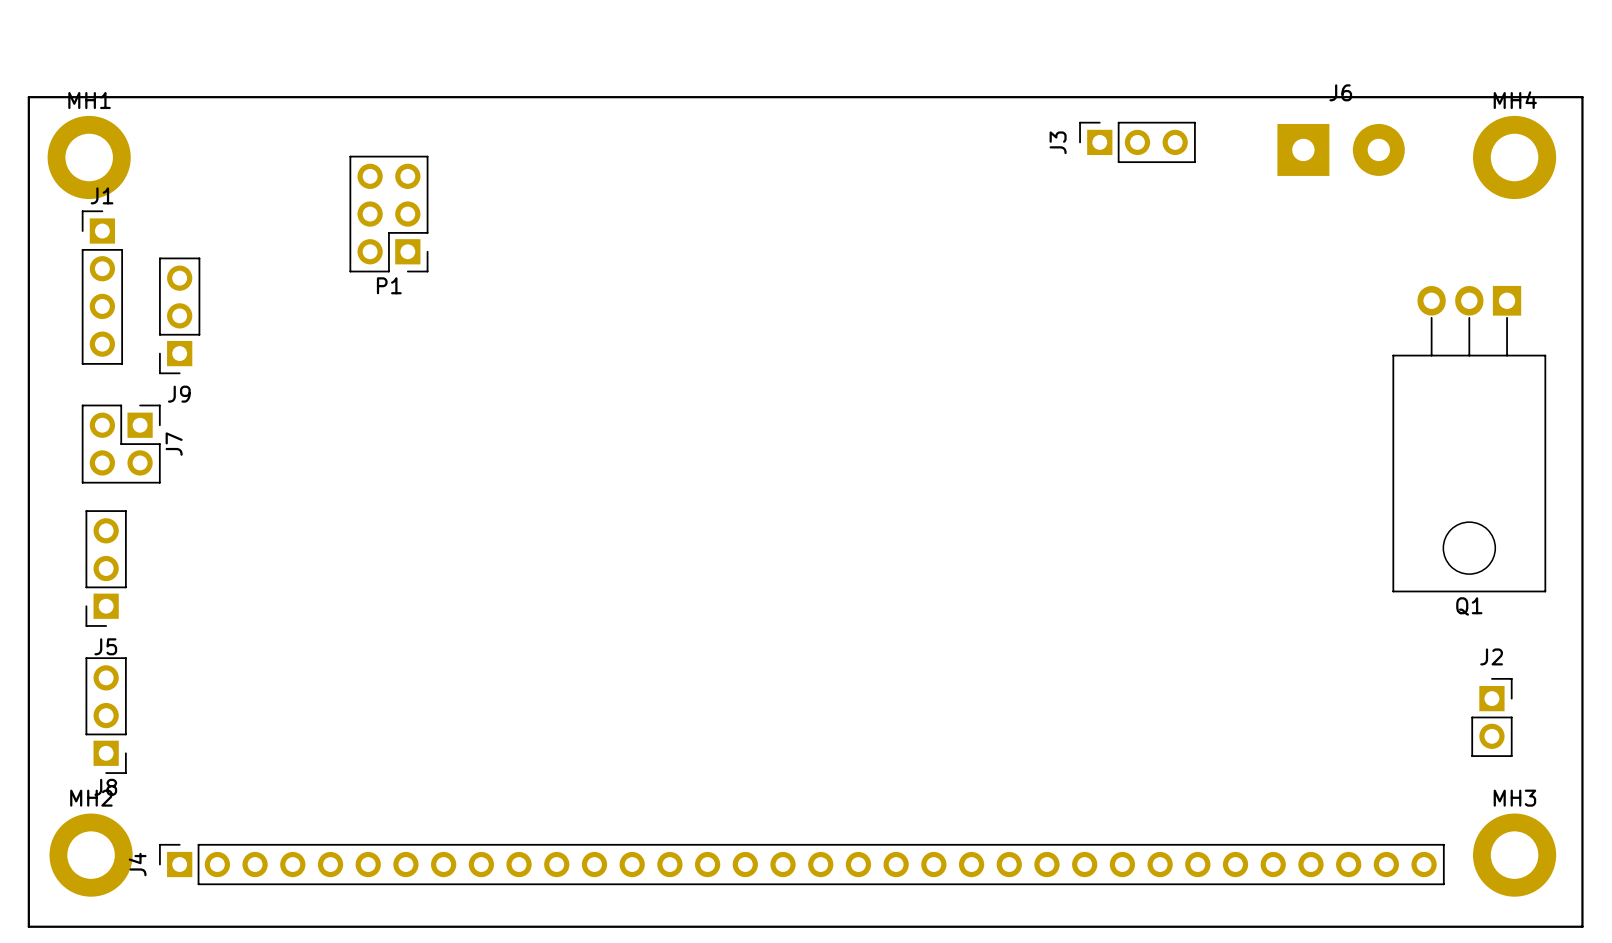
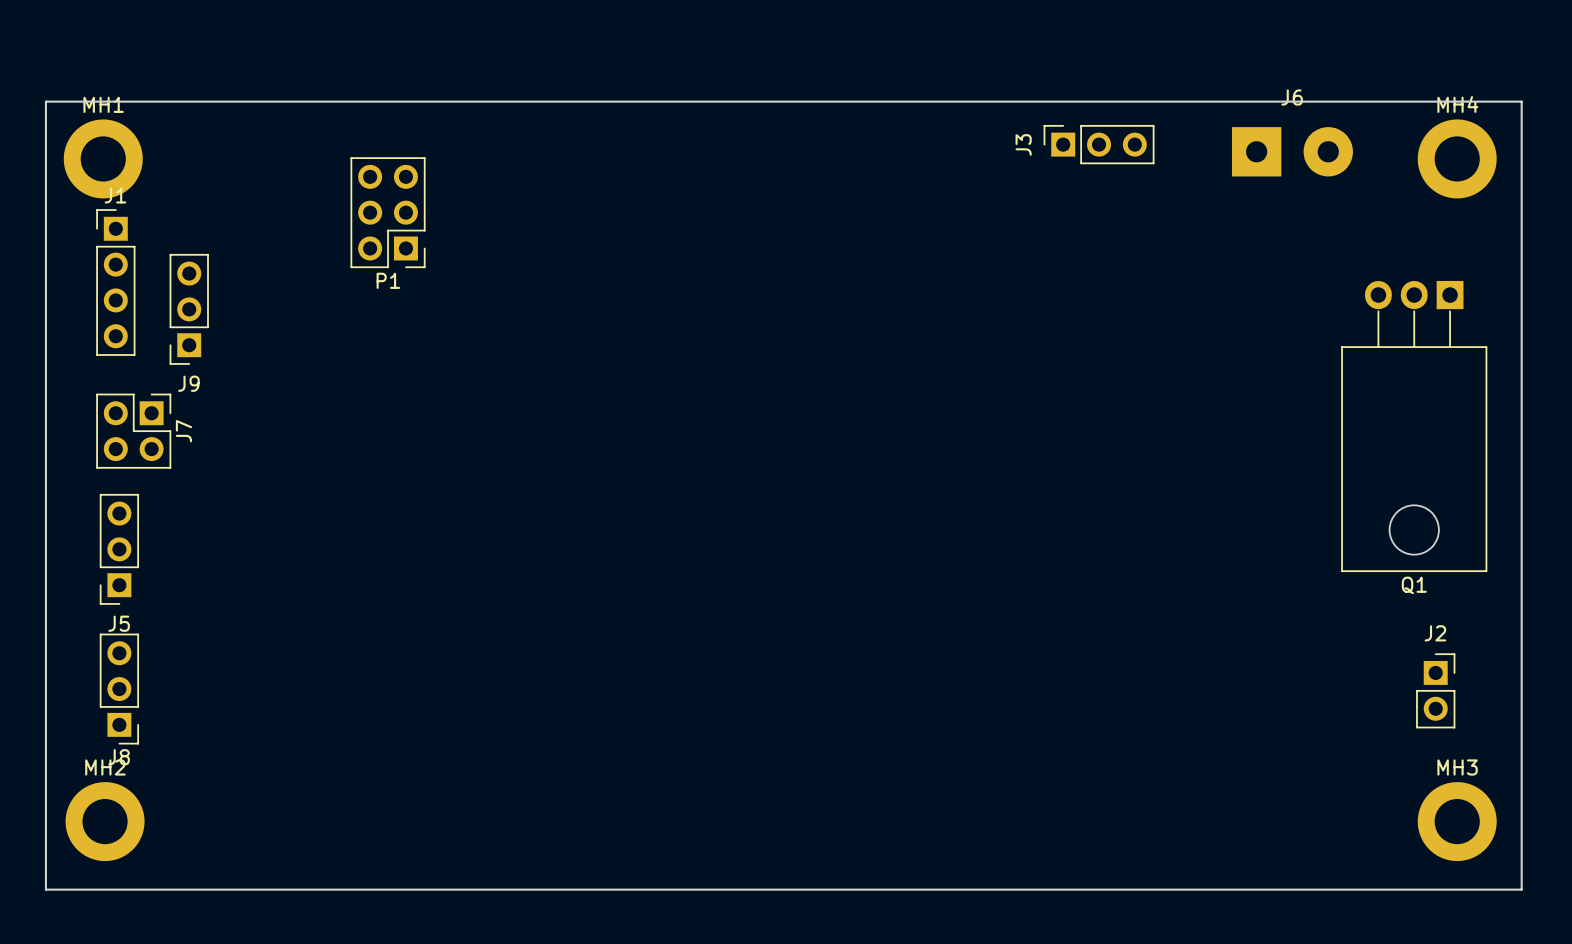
J4: (801, 864) -> none

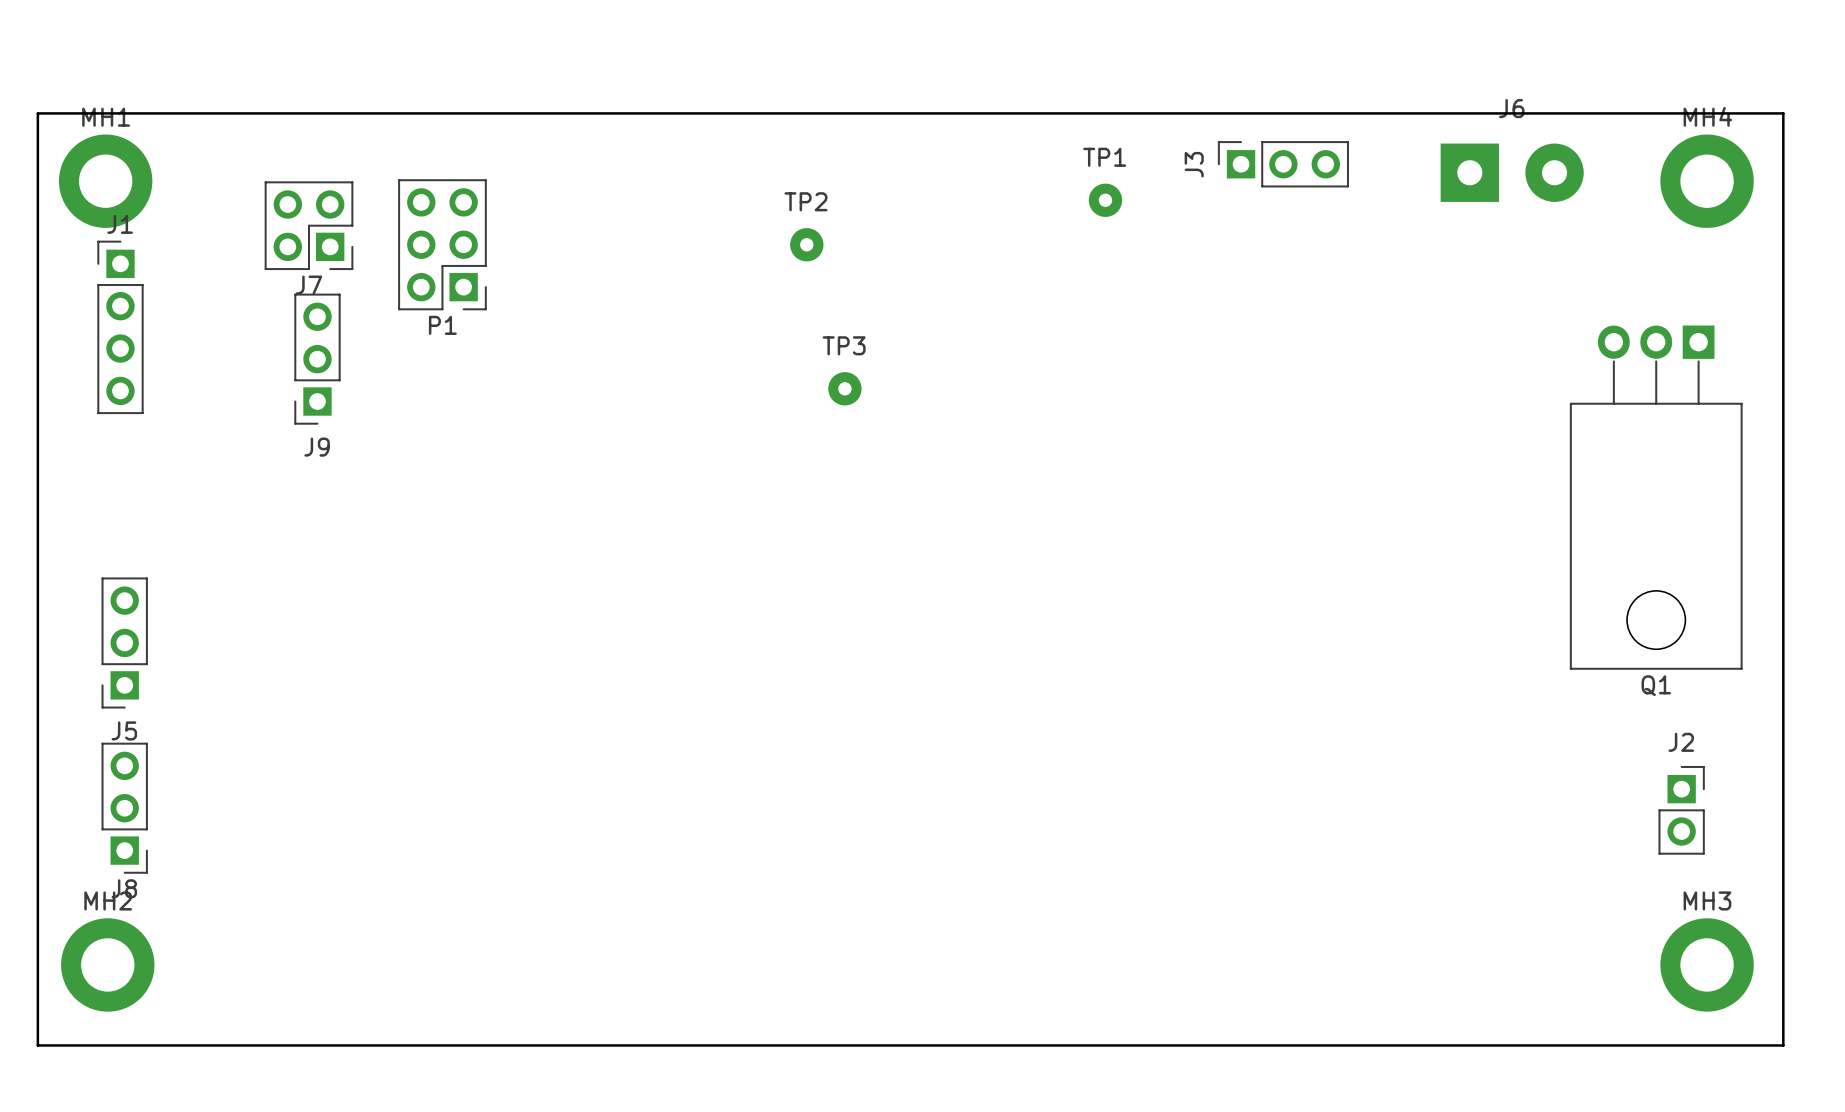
TP1: none -> (1105, 200)
TP2: none -> (806, 244)
J9 position: (189, 309) -> (317, 359)
TP3: none -> (844, 388)
J7 rotation: 0° (133, 431) -> 90° clockwise (309, 225)
J7 position: (133, 431) -> (309, 225)

